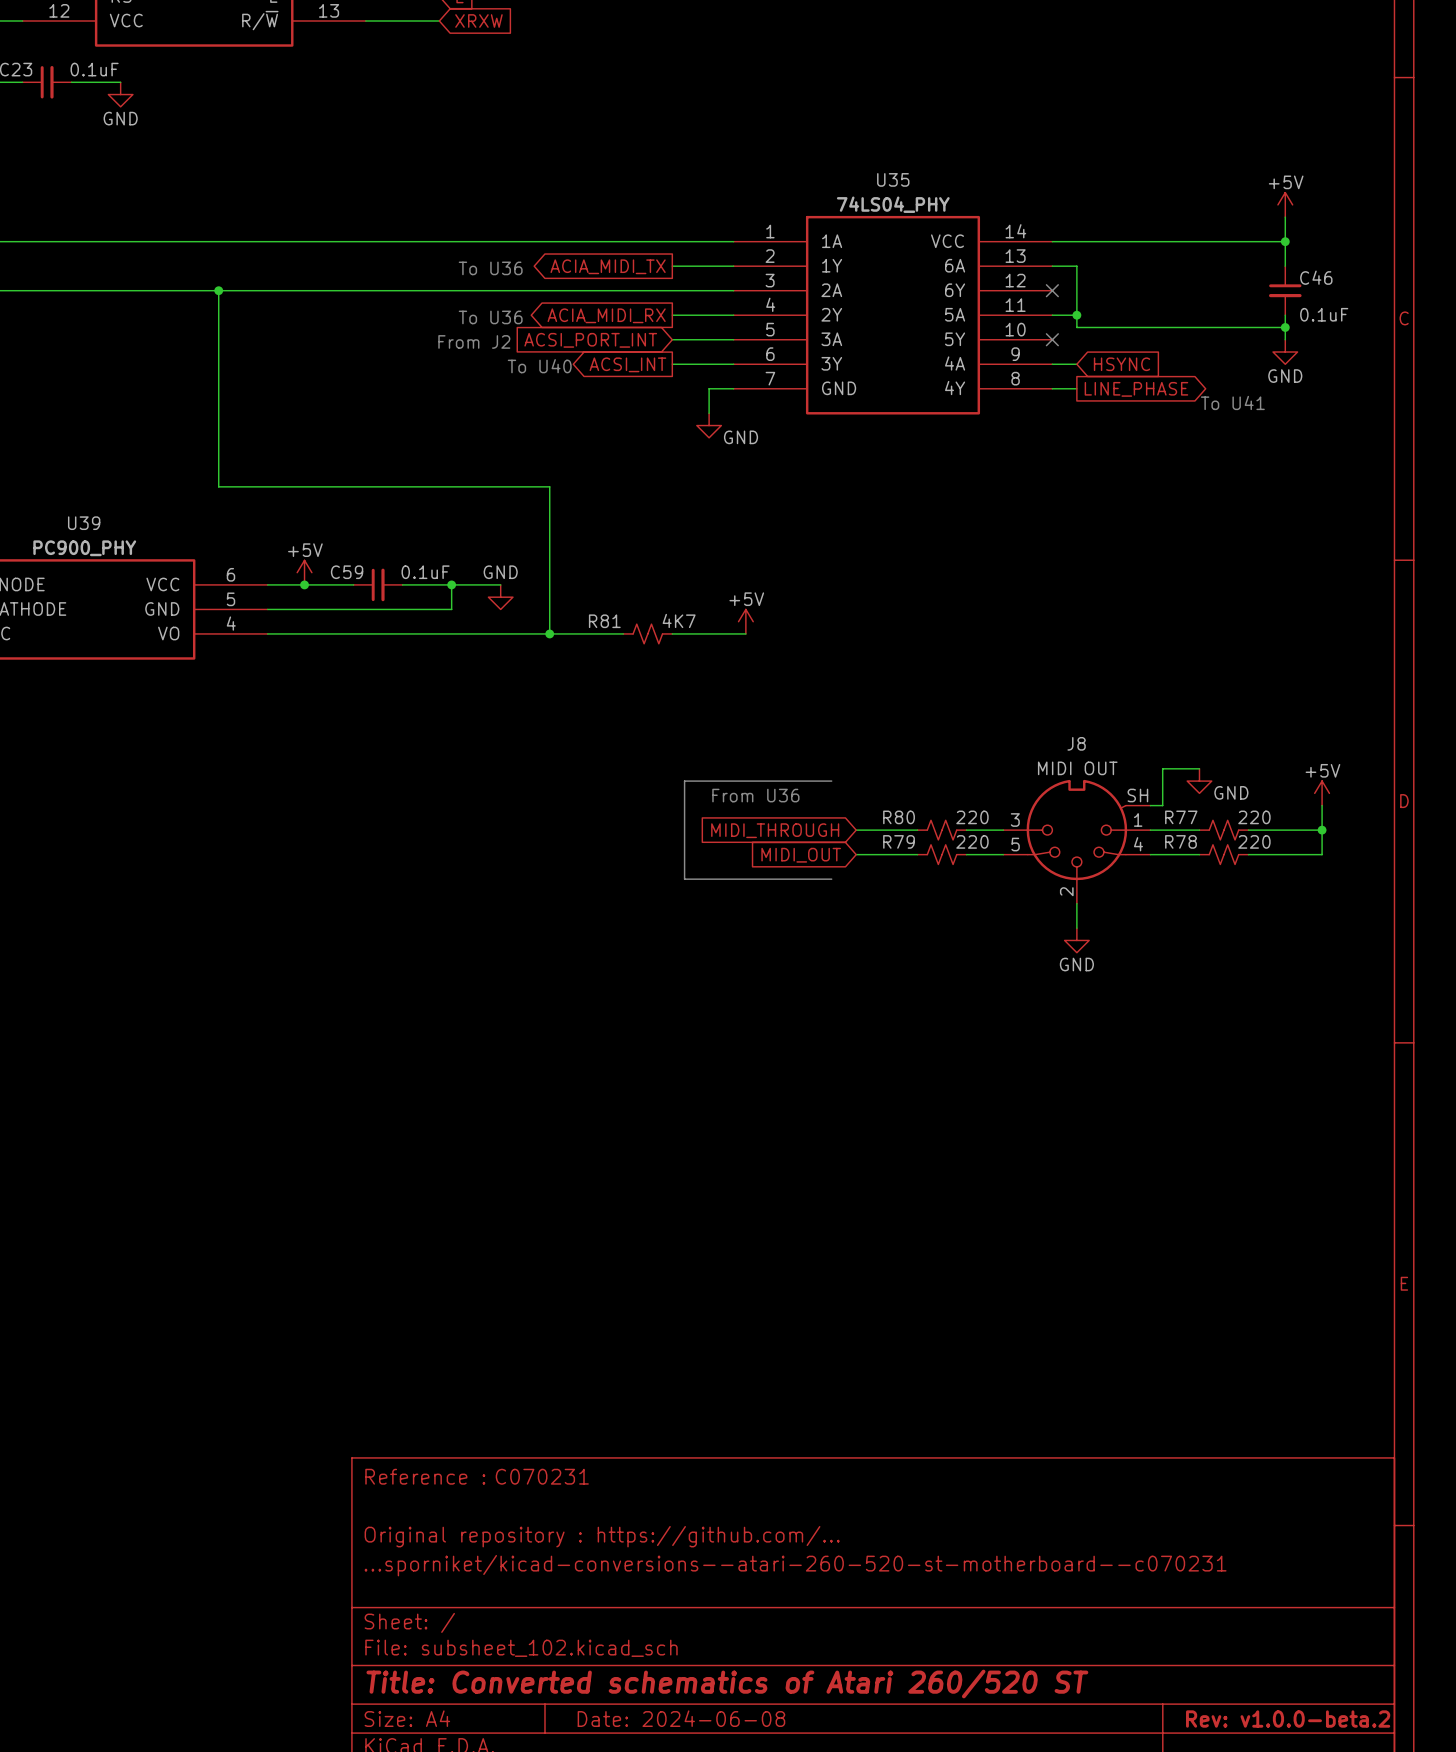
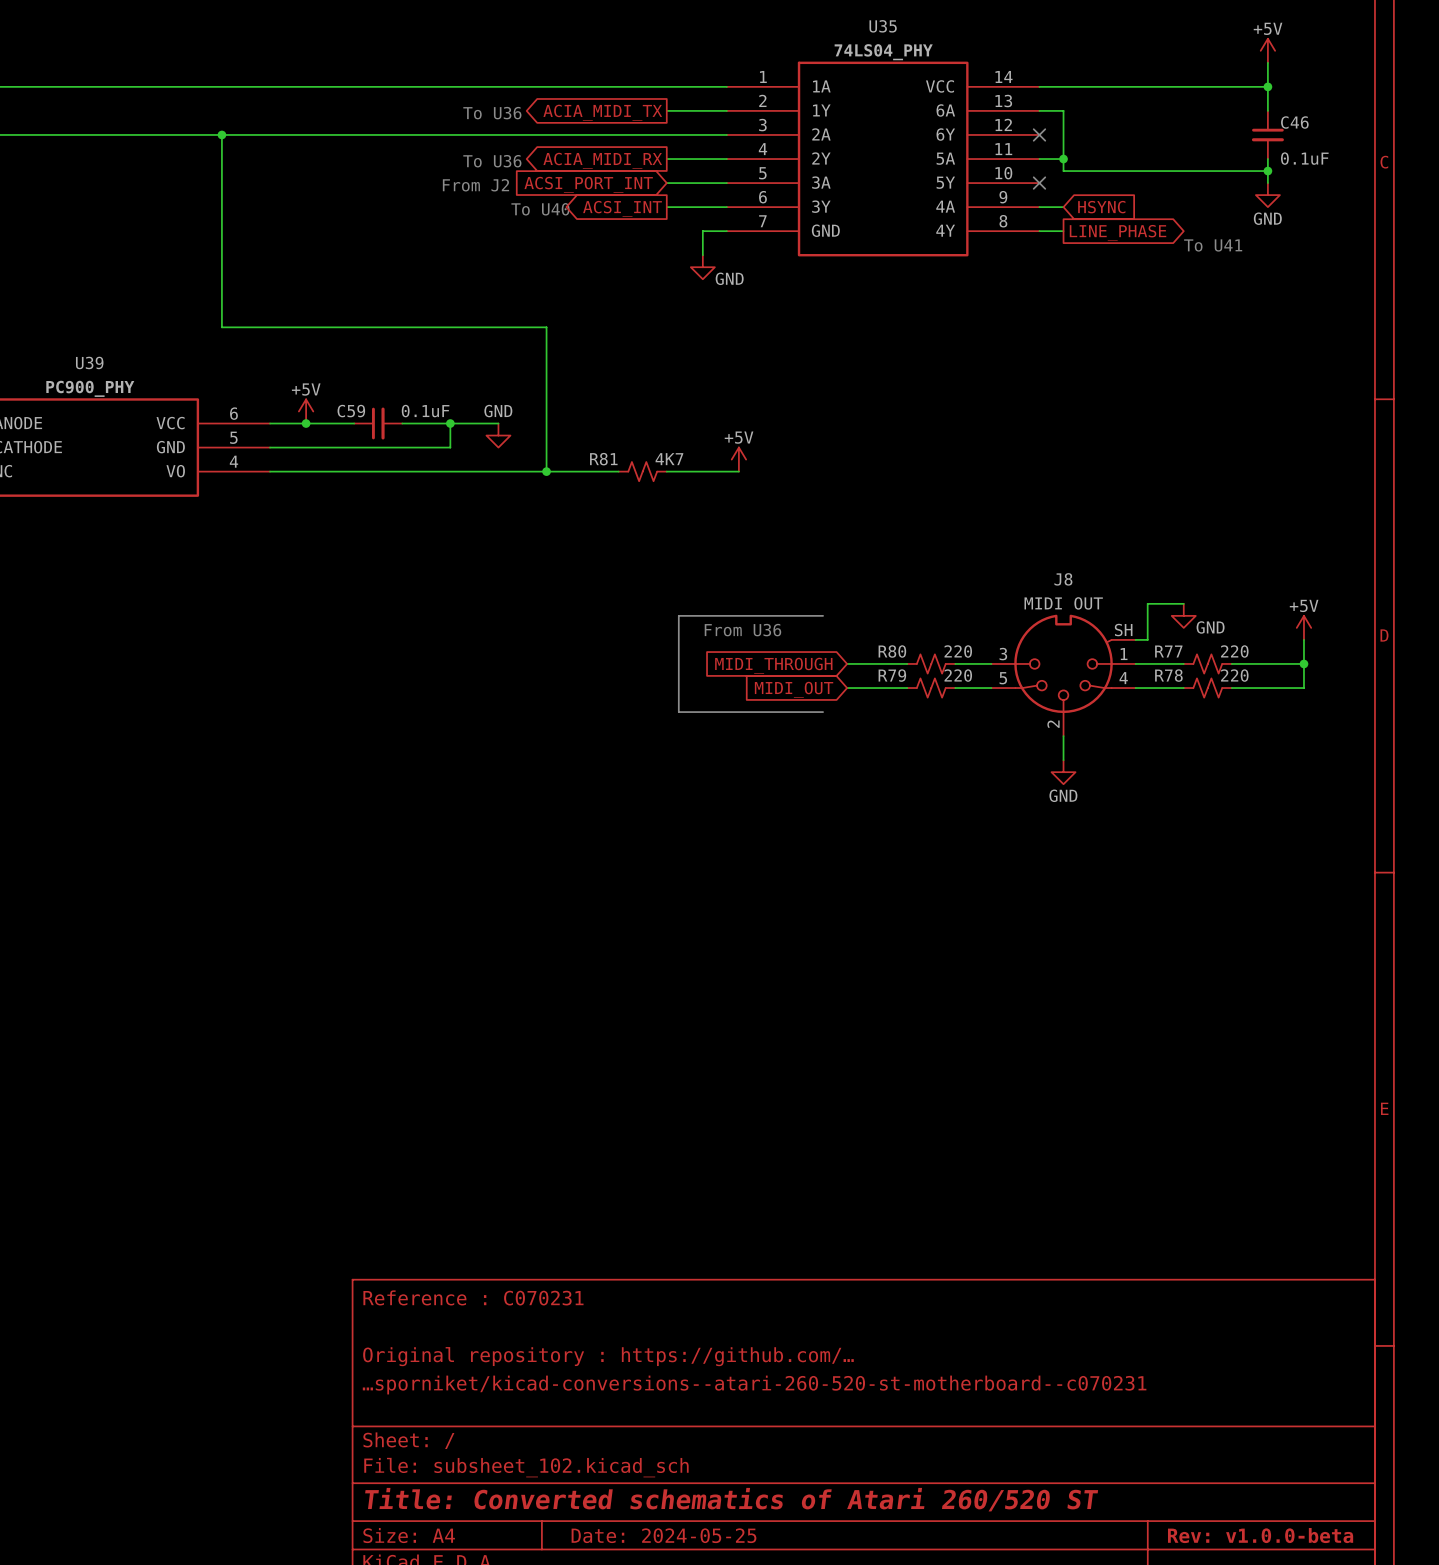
title block: Date: 2024-06-08 (681, 1718) -> Date: 2024-05-25 (663, 1535)
title block: Rev: v1.0.0-beta.2 (1288, 1719) -> Rev: v1.0.0-beta (1260, 1535)

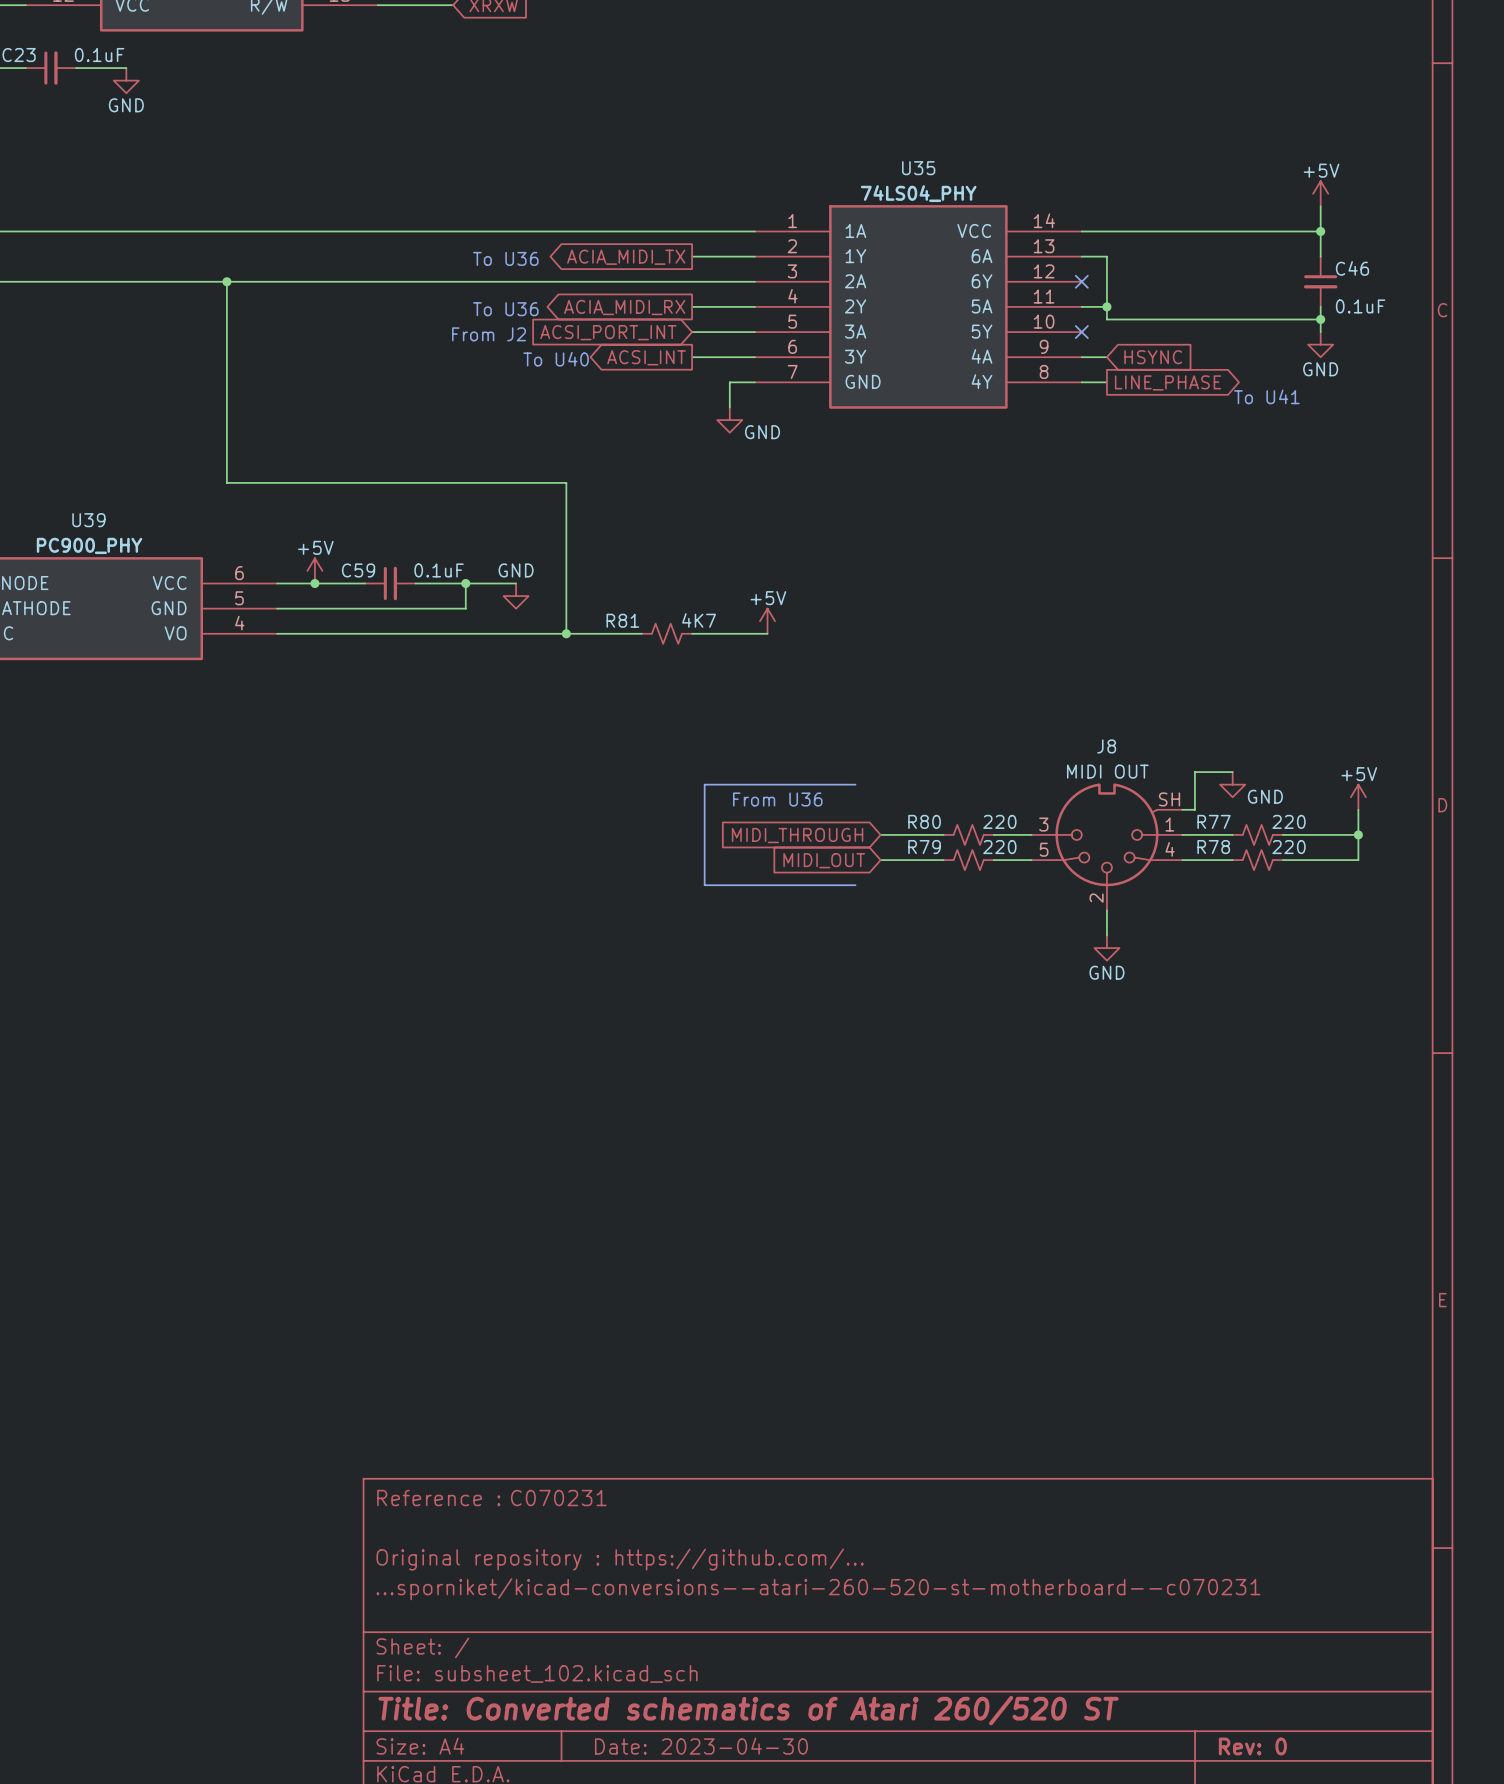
title block: Date: 2024-05-25 (663, 1535) -> Date: 2023-04-30 (701, 1746)
title block: Rev: v1.0.0-beta (1260, 1535) -> Rev: 0 (1252, 1746)

